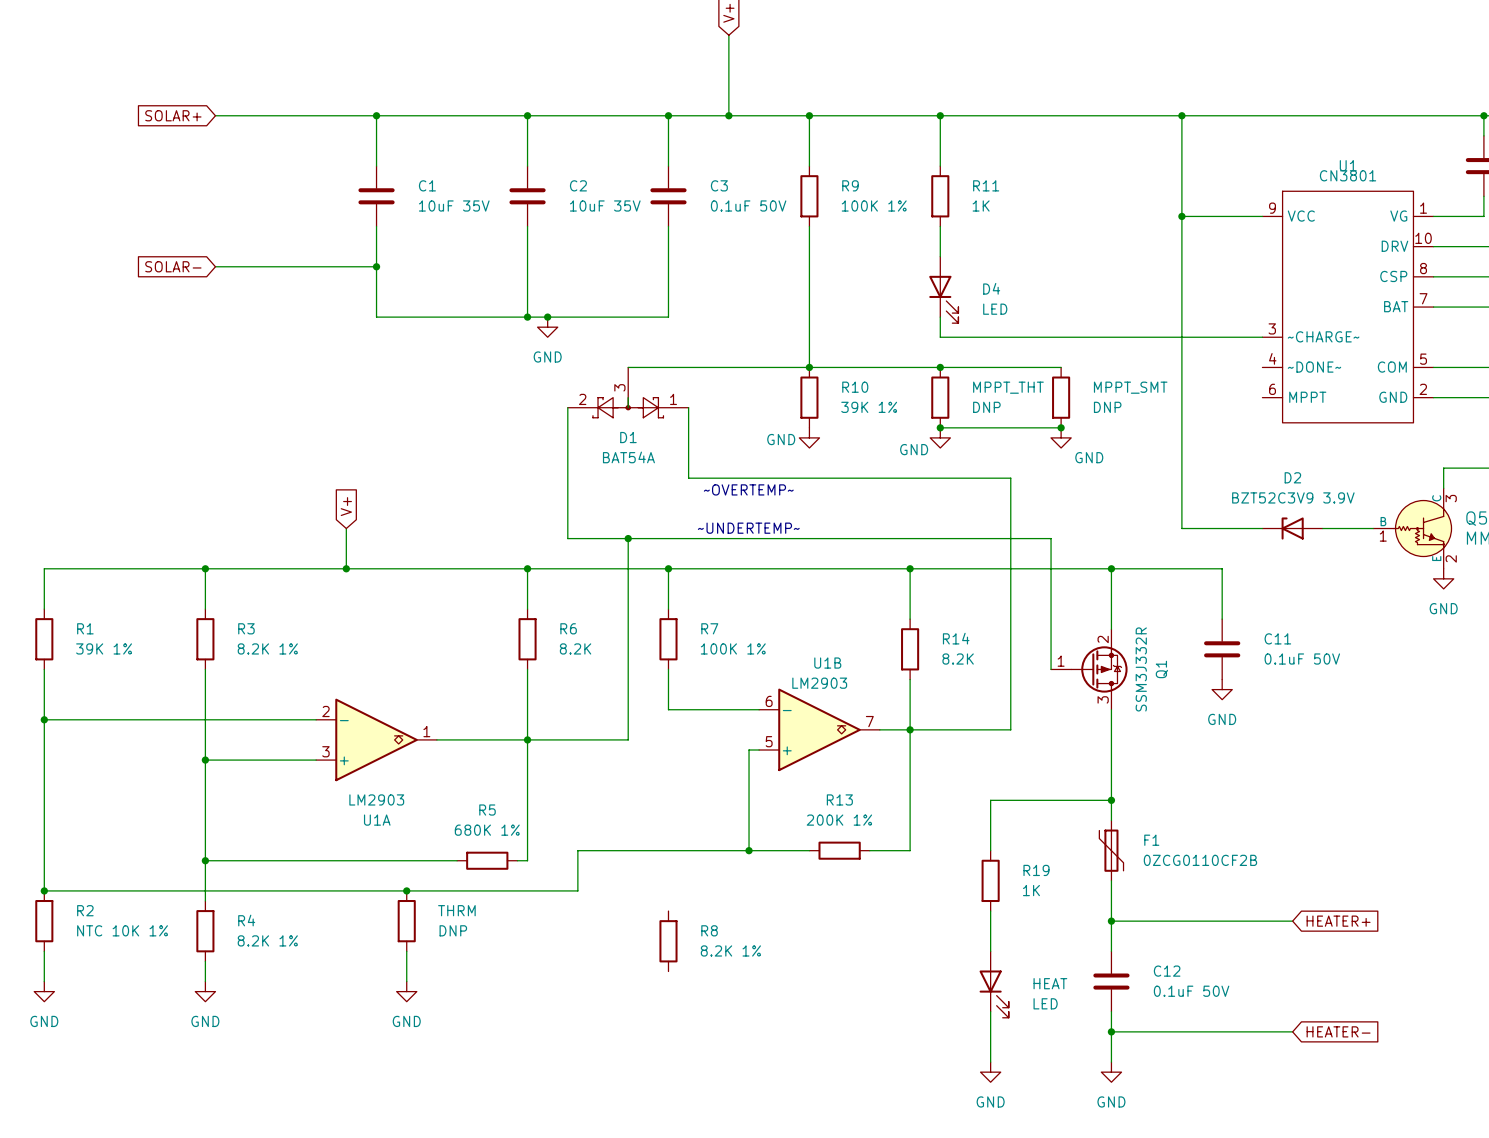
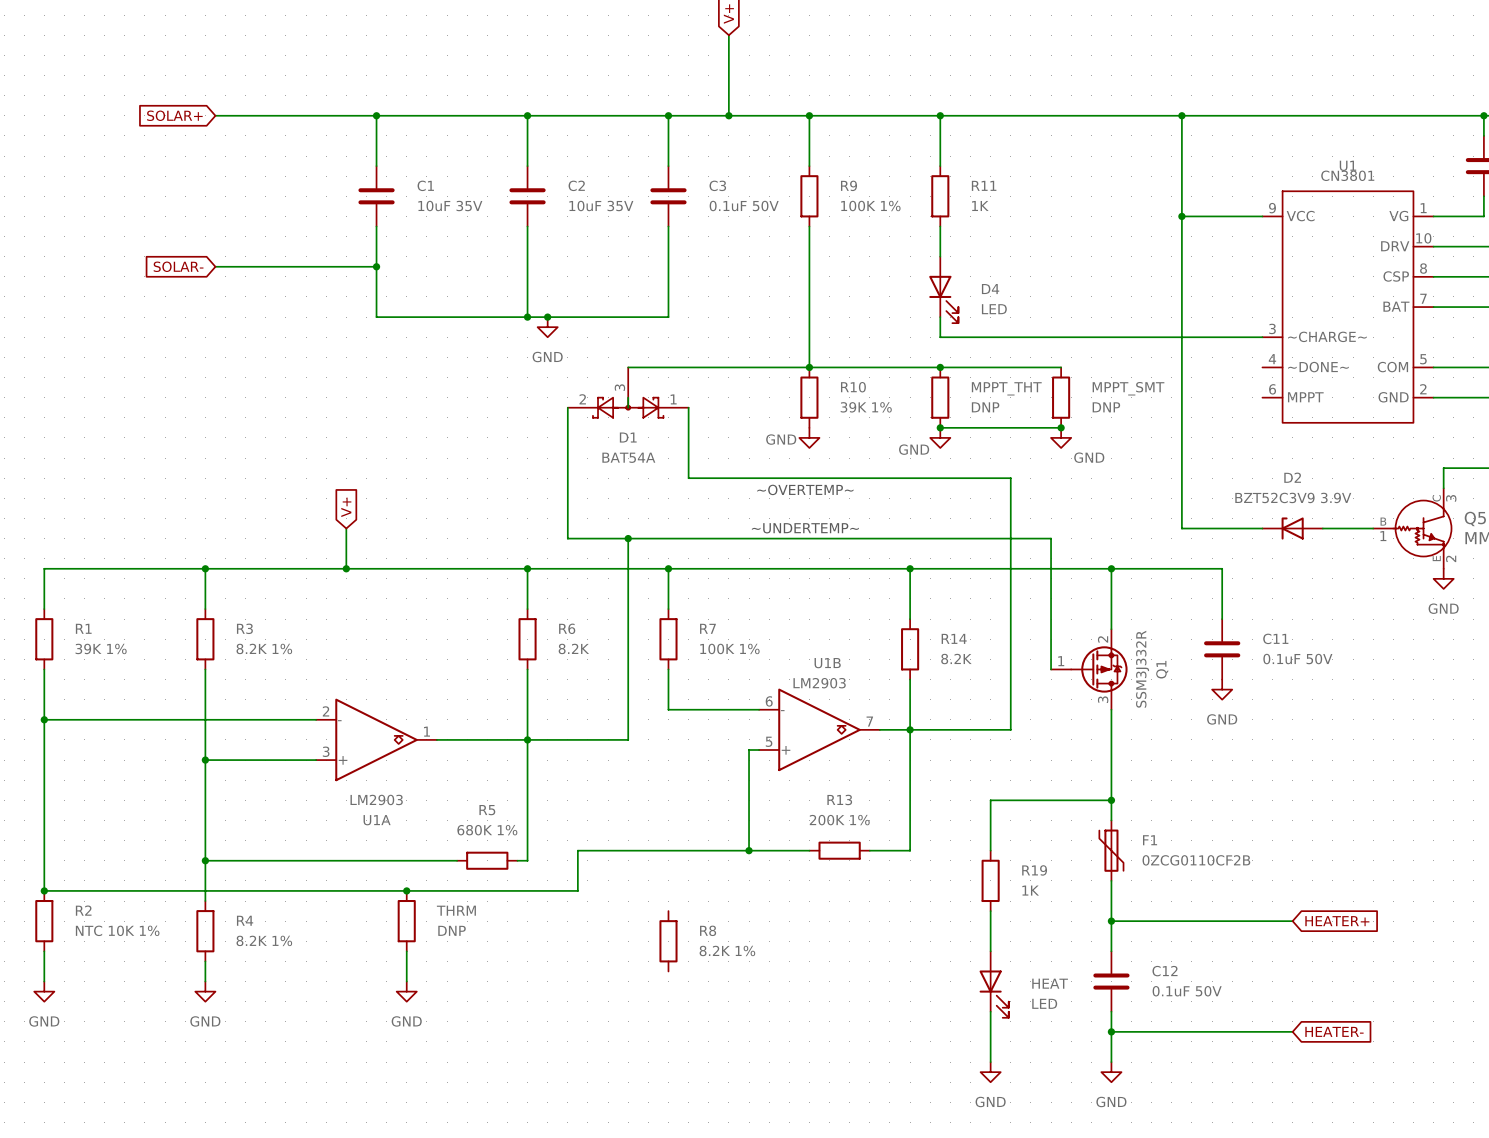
text position: ~OVERTEMP~ (748, 489) -> ~OVERTEMP~ (805, 489)
text position: ~UNDERTEMP~ (748, 528) -> ~UNDERTEMP~ (805, 528)

